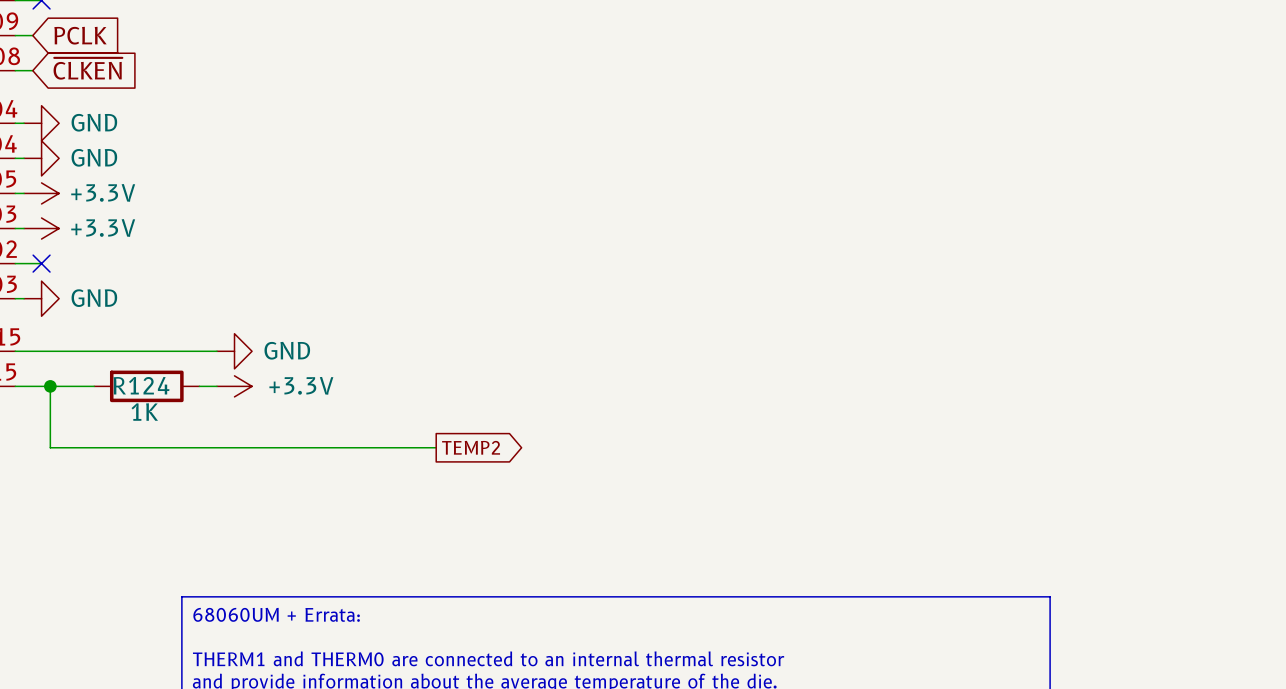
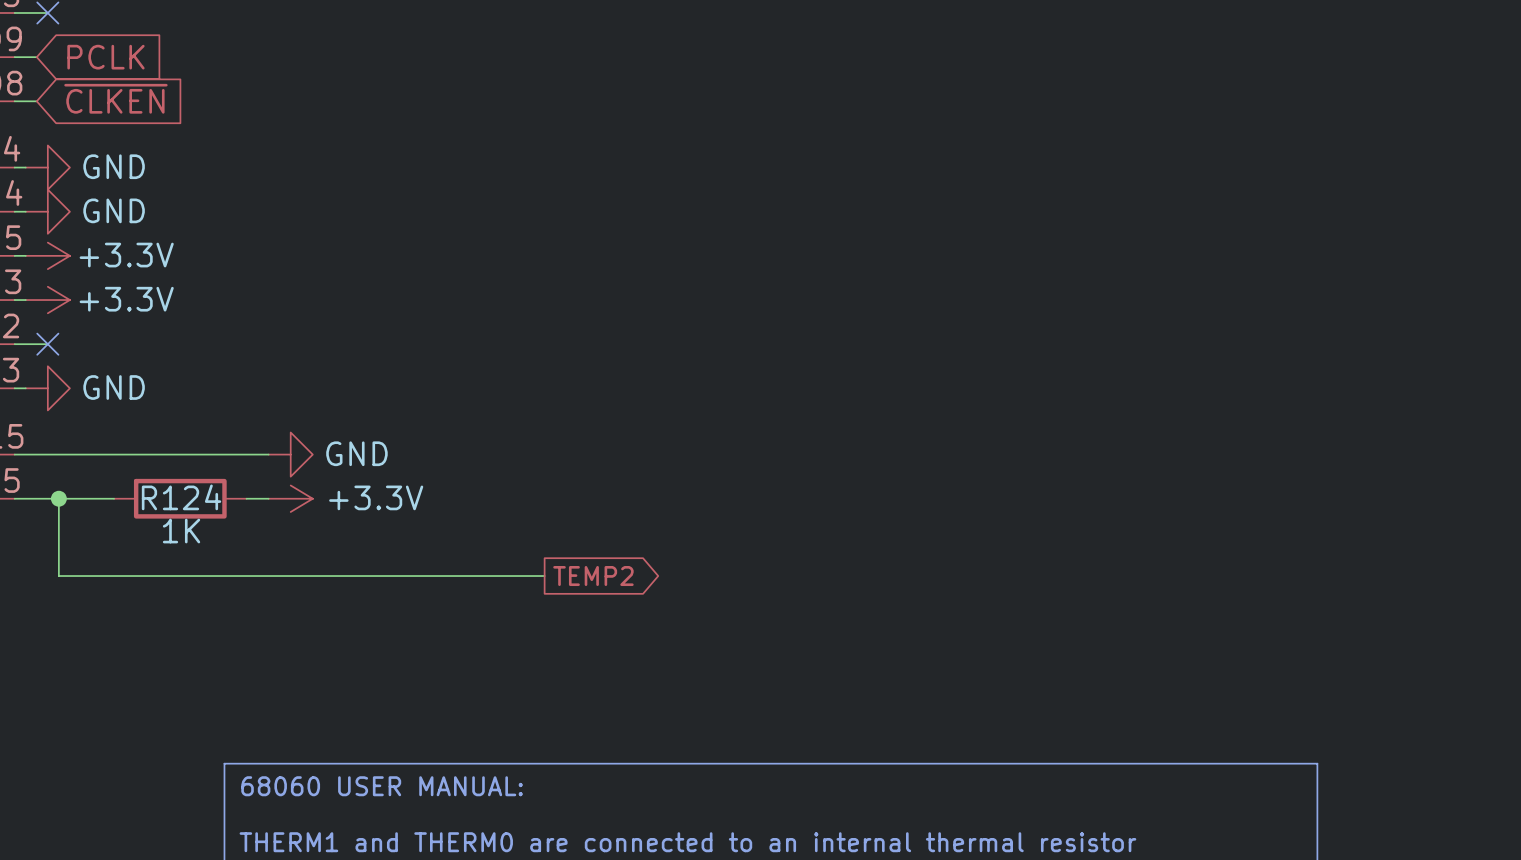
text: 68060UM + Errata: (276, 614) -> 68060 USER MANUAL: (382, 786)

